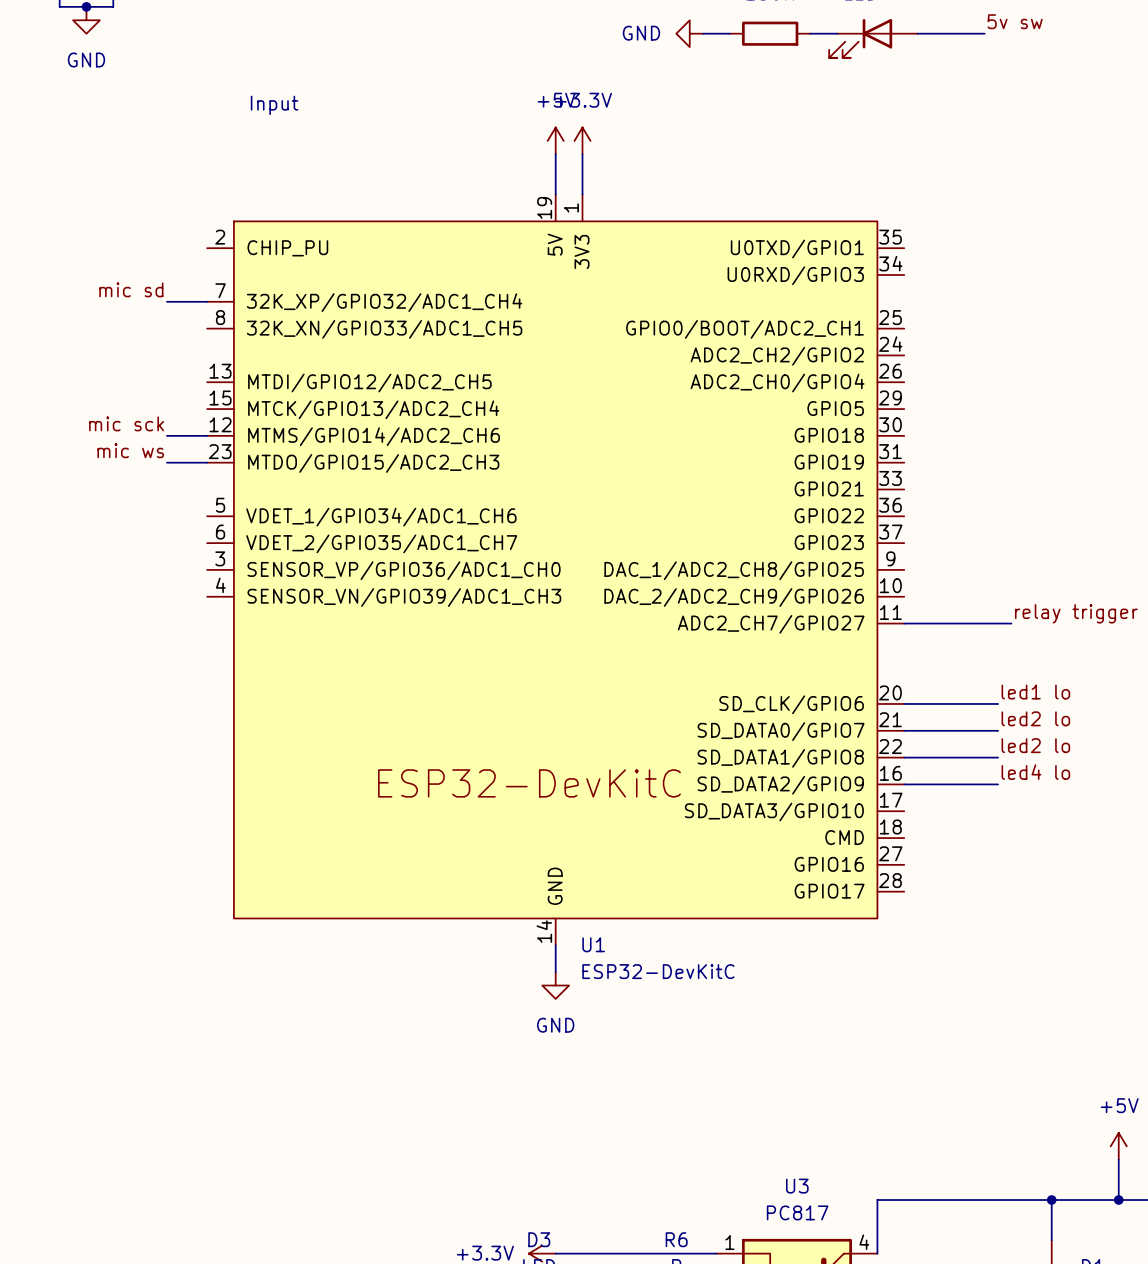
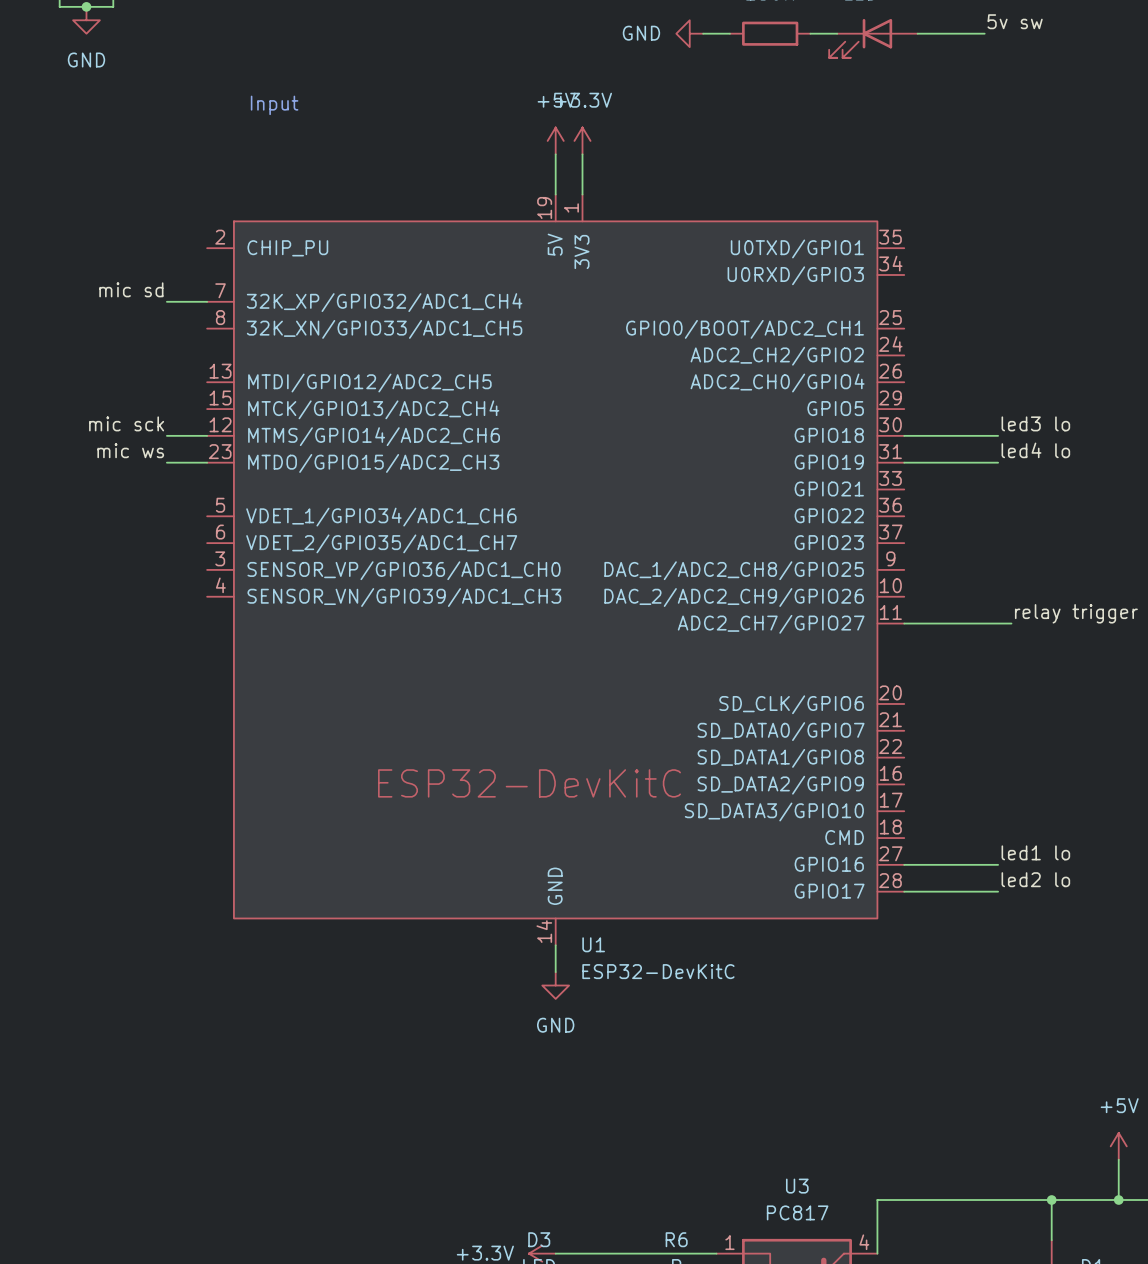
label: none -> led3 lo (1035, 423)
wire: none -> (904, 435) (998, 435)
label: none -> led4 lo (1035, 450)
label position: led1 lo (1035, 692) -> led1 lo (1035, 852)
wire: (904, 703) (998, 703) -> (904, 462) (998, 462)
label: led2 lo (1035, 718) -> none
wire: (904, 730) (998, 730) -> none
label: led2 lo (1035, 745) -> none
wire: (904, 757) (998, 757) -> (904, 891) (998, 891)
label: led4 lo (1035, 772) -> none
wire: (904, 784) (998, 784) -> (904, 864) (998, 864)
label: none -> led2 lo (1035, 879)

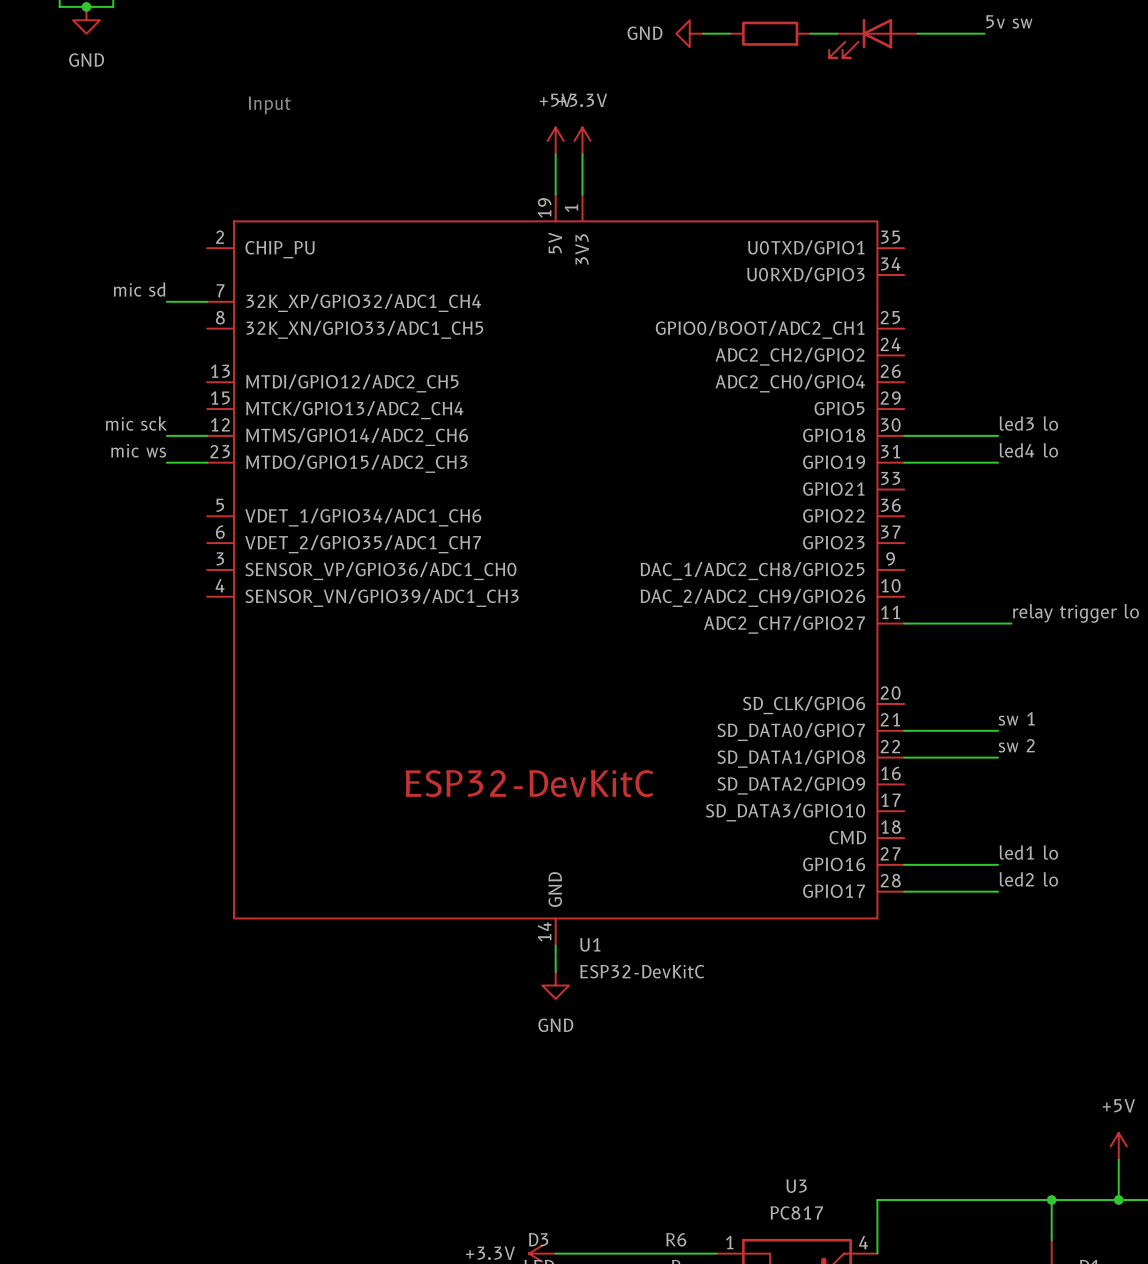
label: none -> sw 1 (1016, 718)
wire: none -> (904, 730) (998, 730)
label: none -> sw 2 (1016, 745)
wire: none -> (904, 757) (998, 757)

